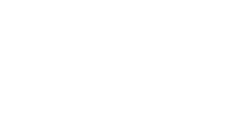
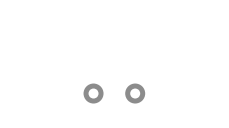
via: none -> (93, 93)
via: none -> (135, 93)

